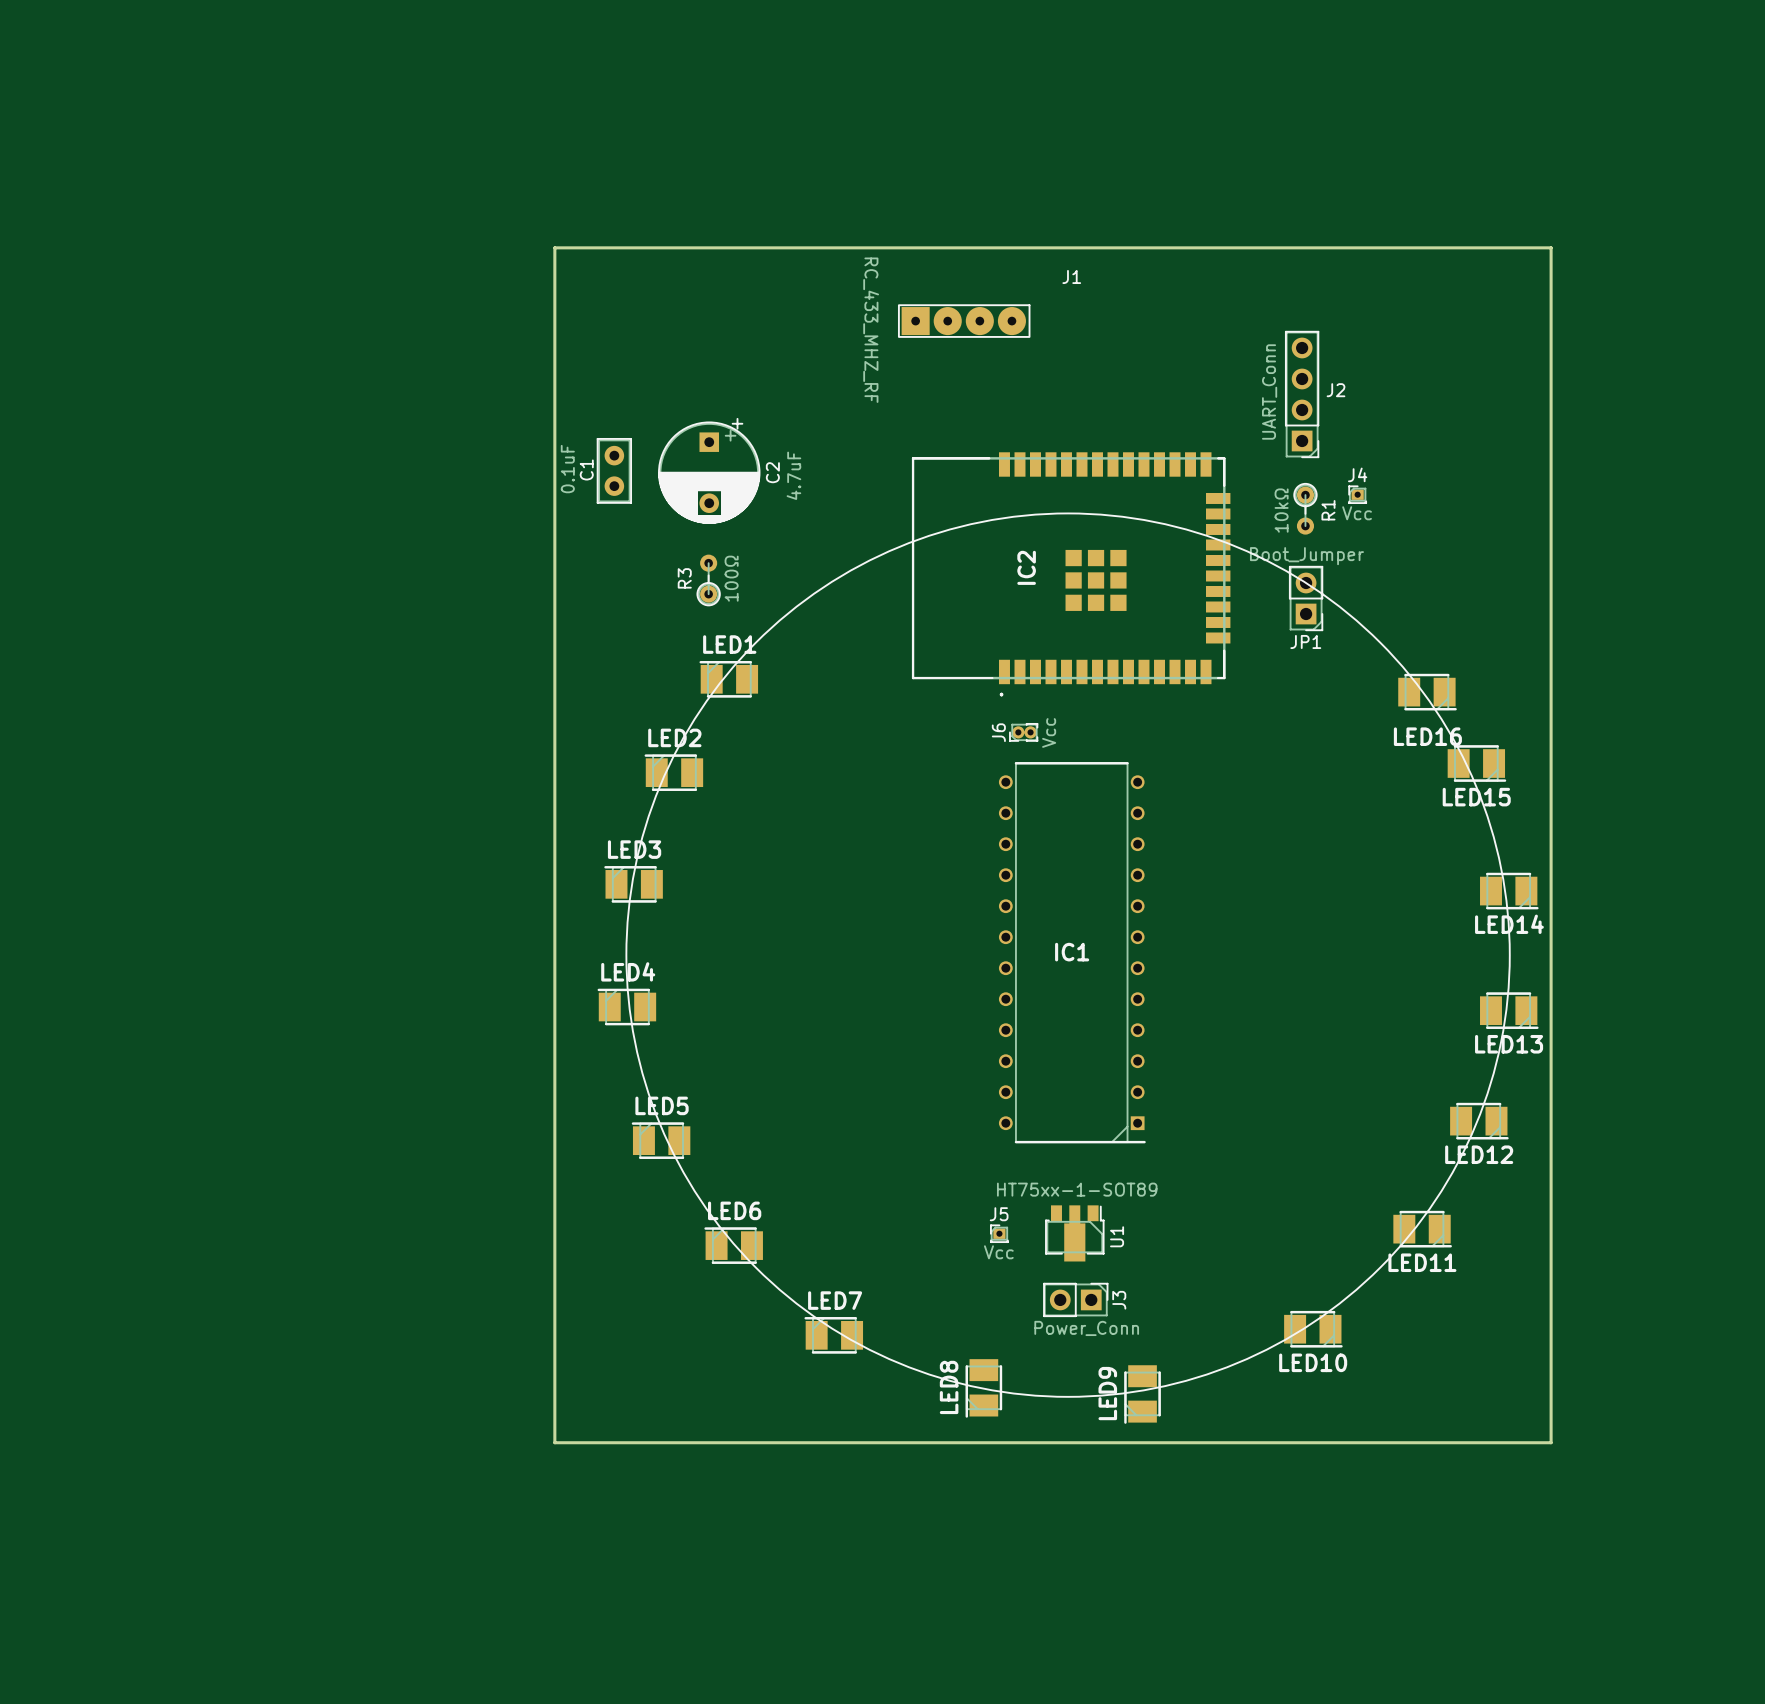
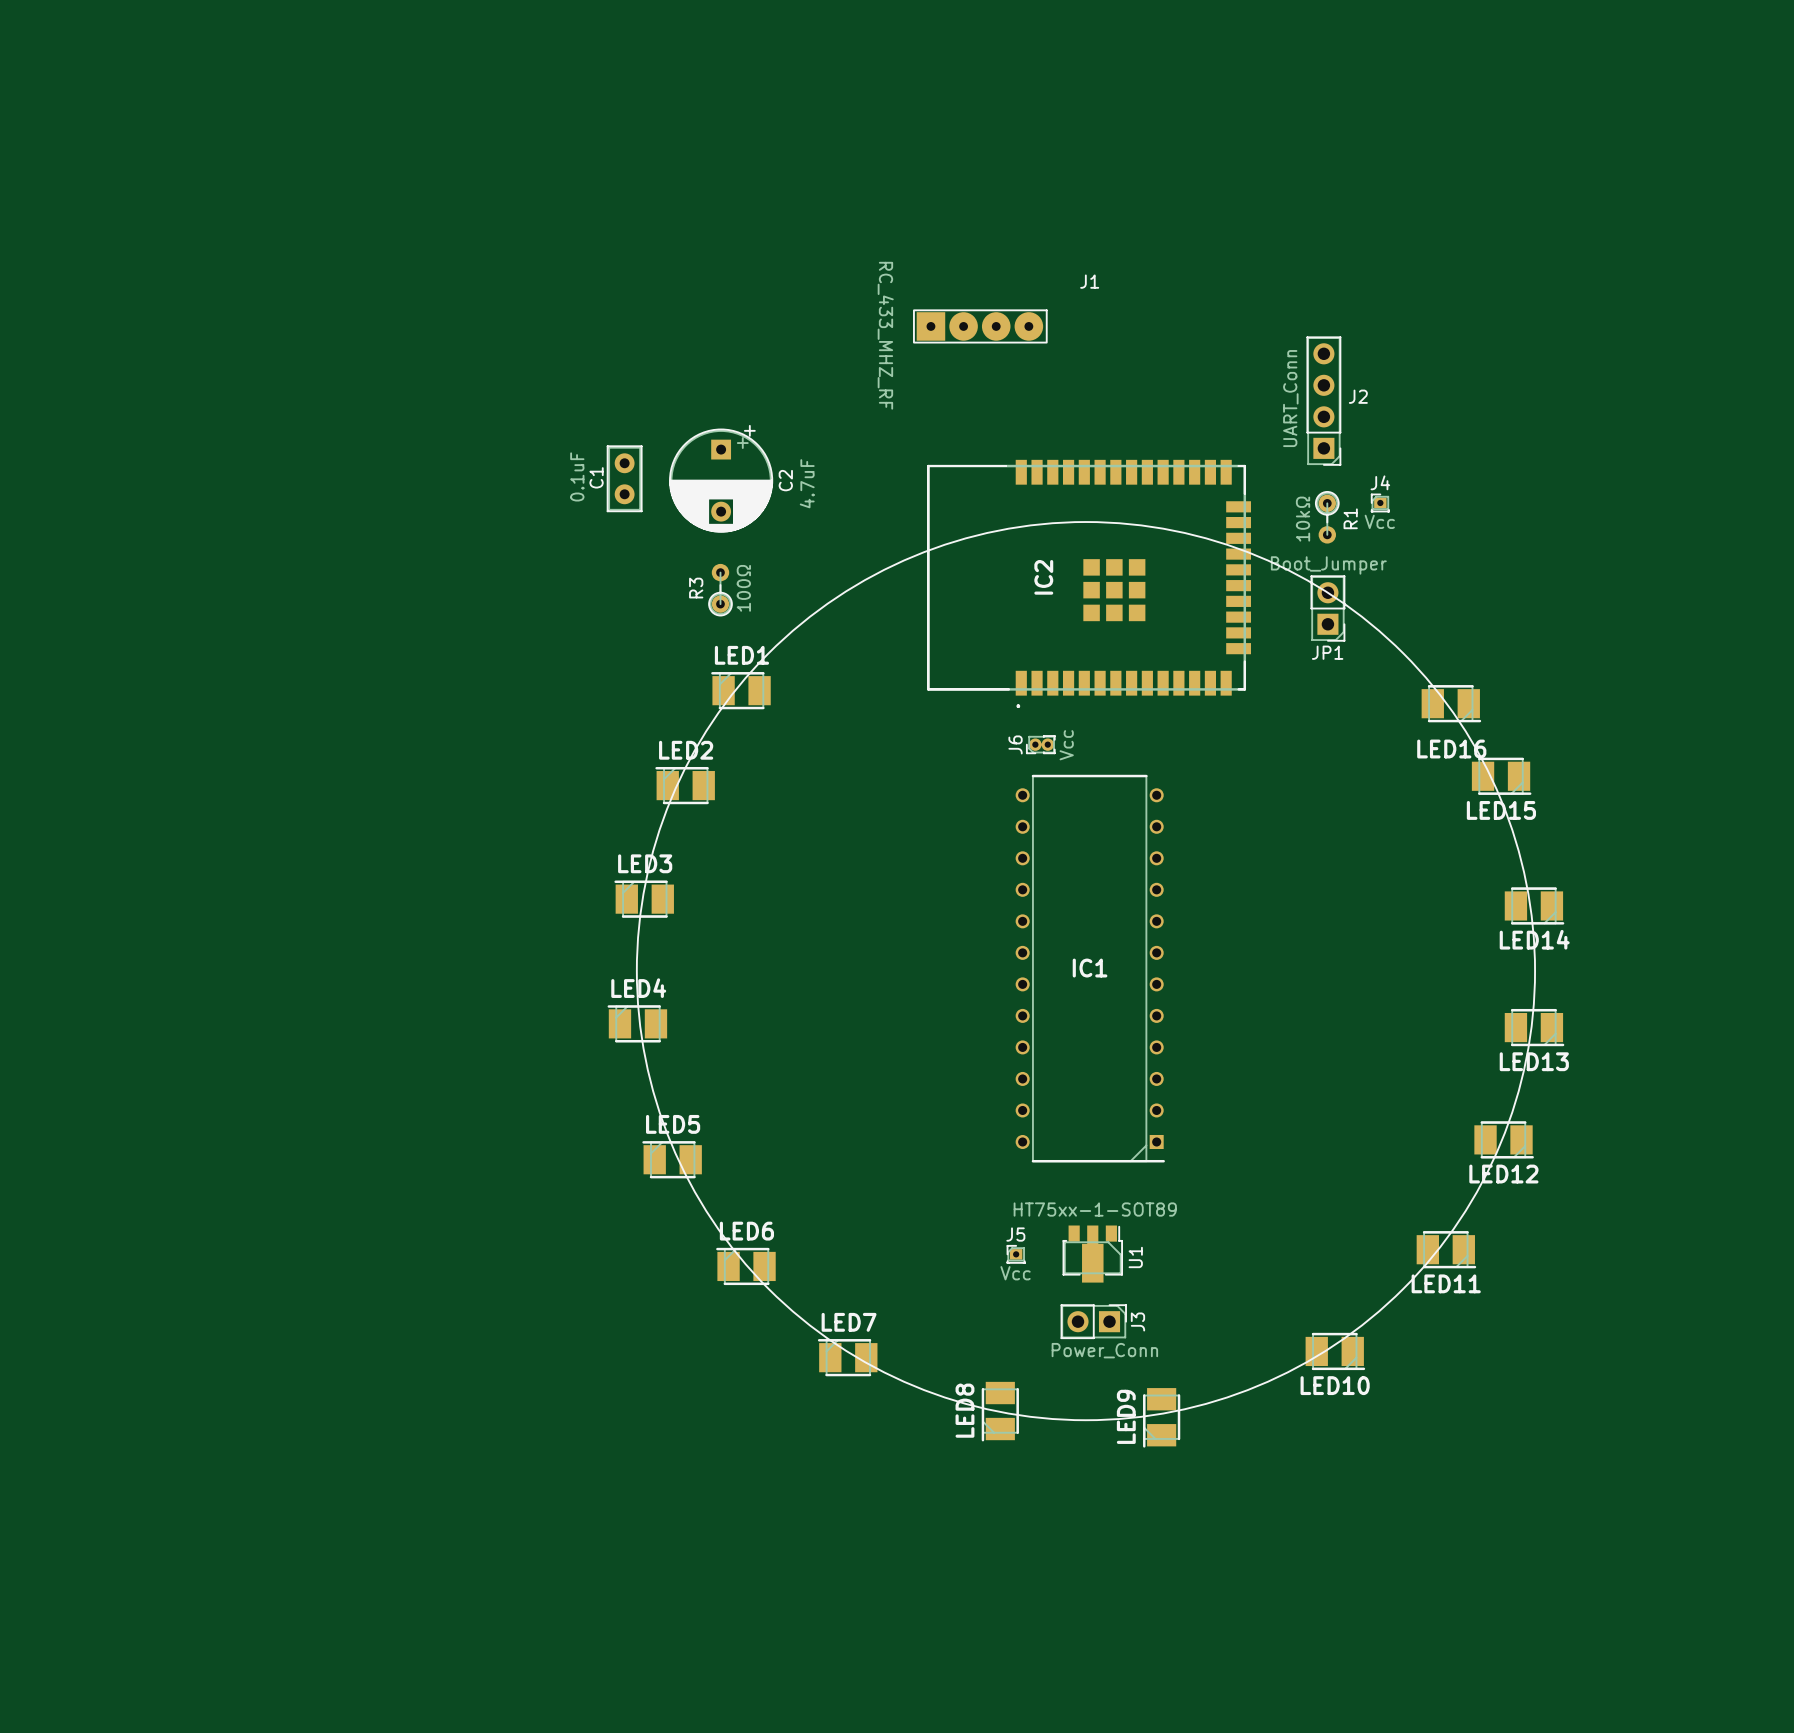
board edge: (554, 247) (1551, 247) (1551, 1442) (554, 1442) (554, 247) -> none

